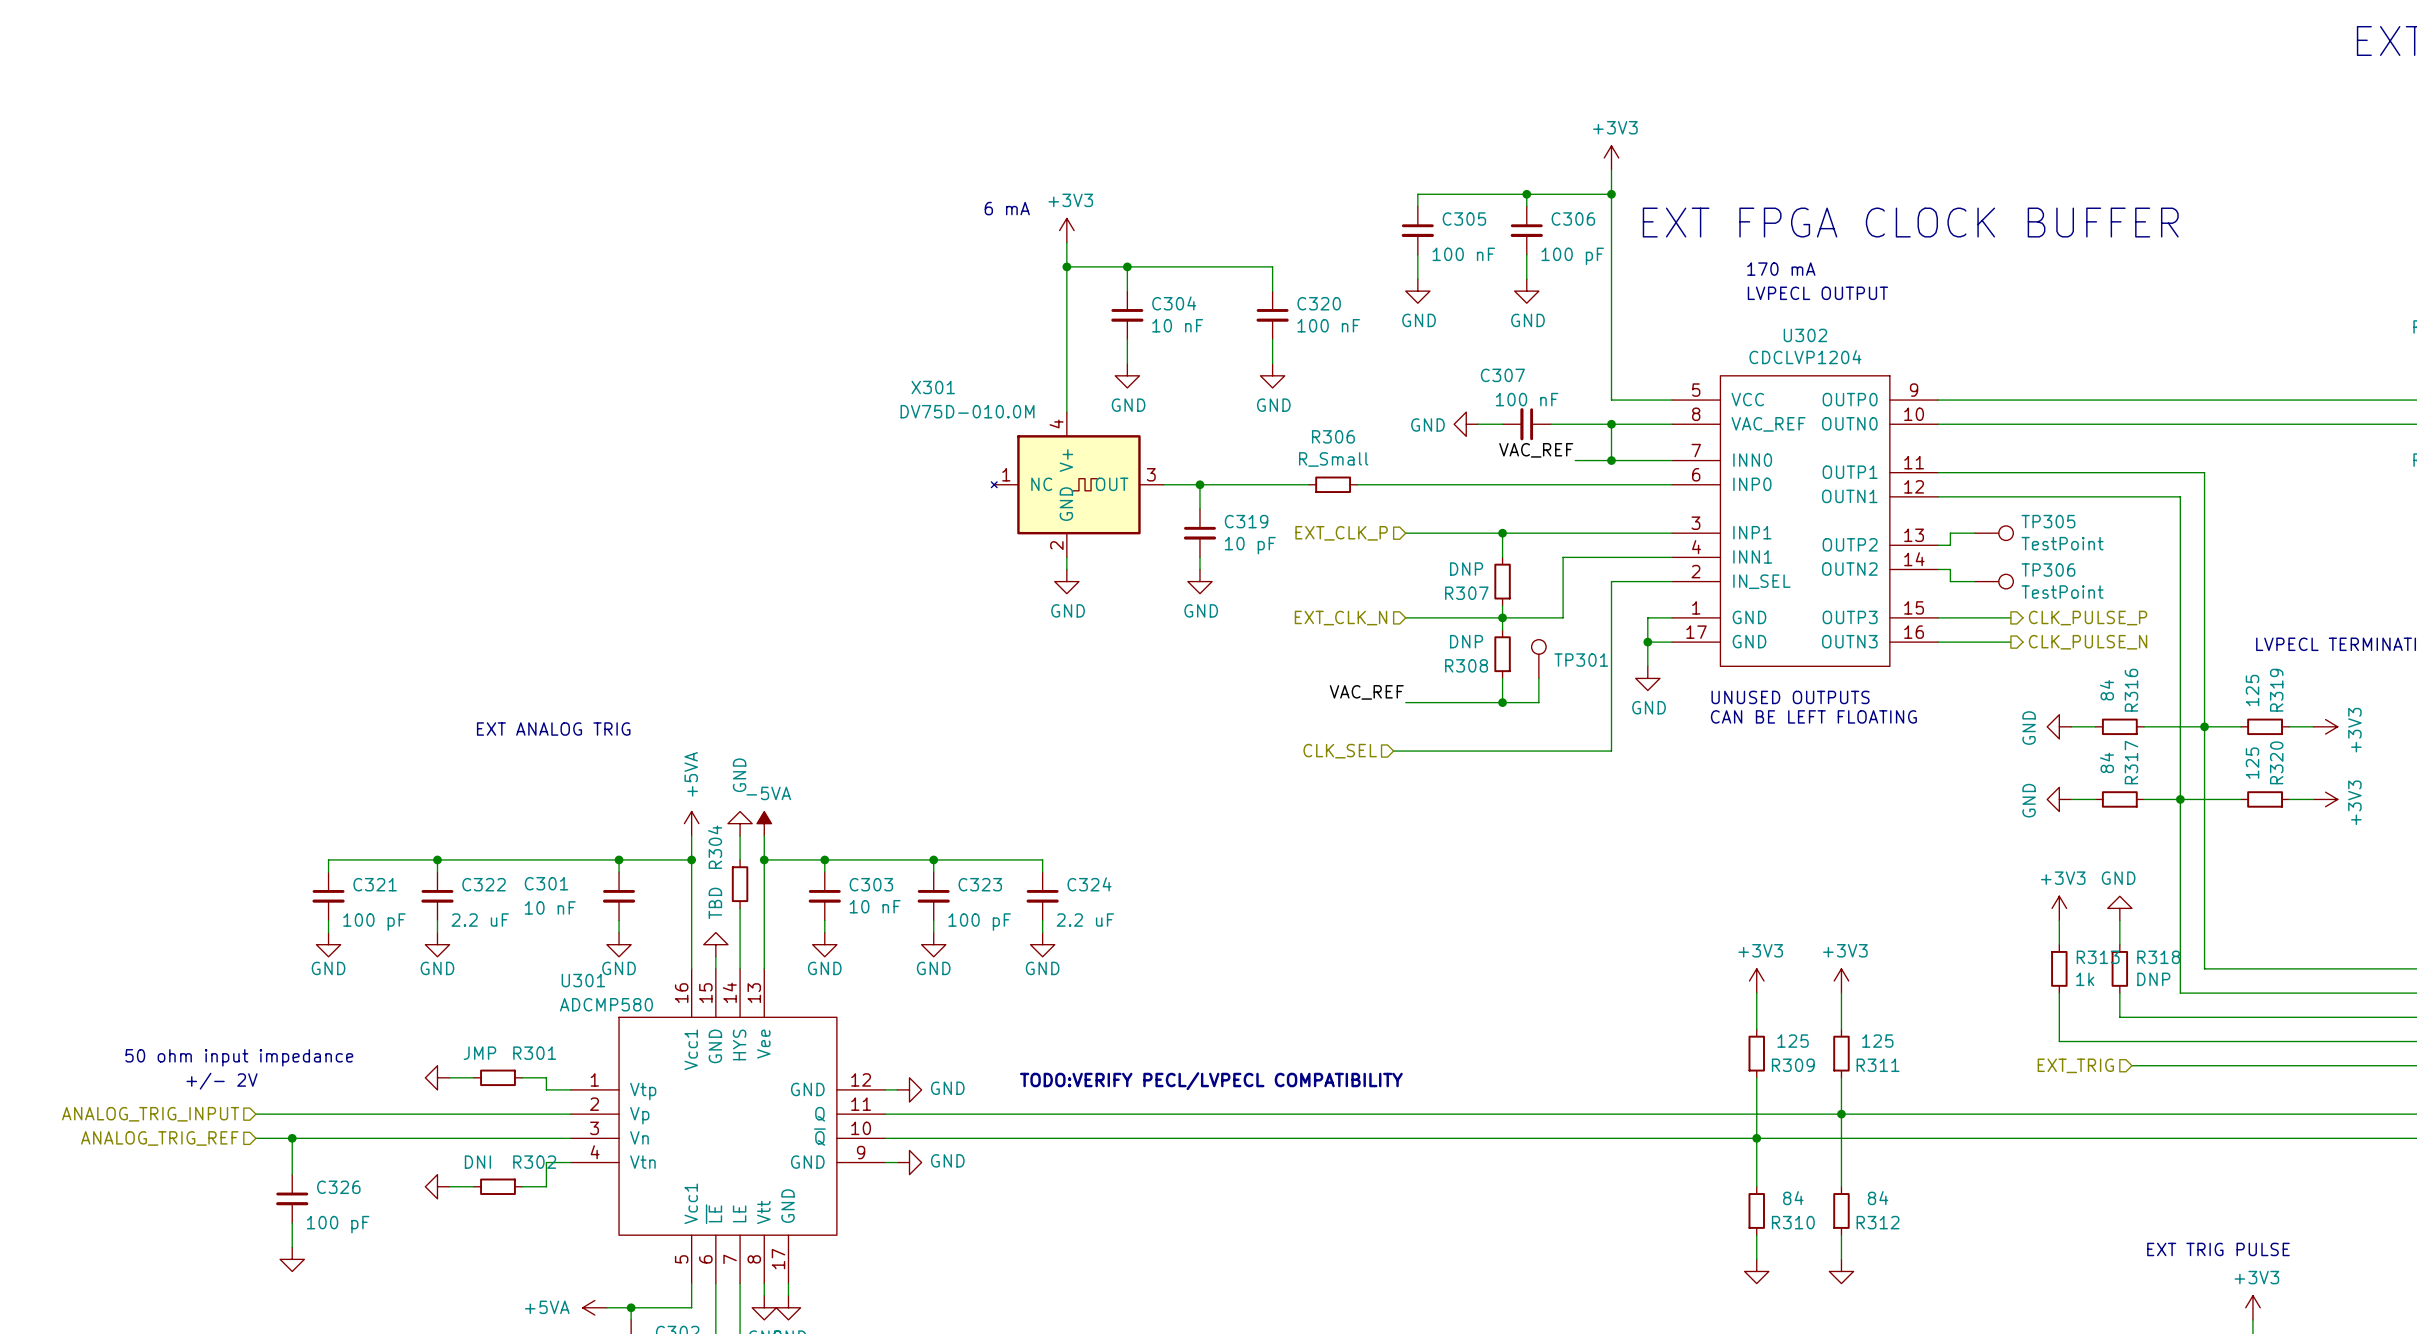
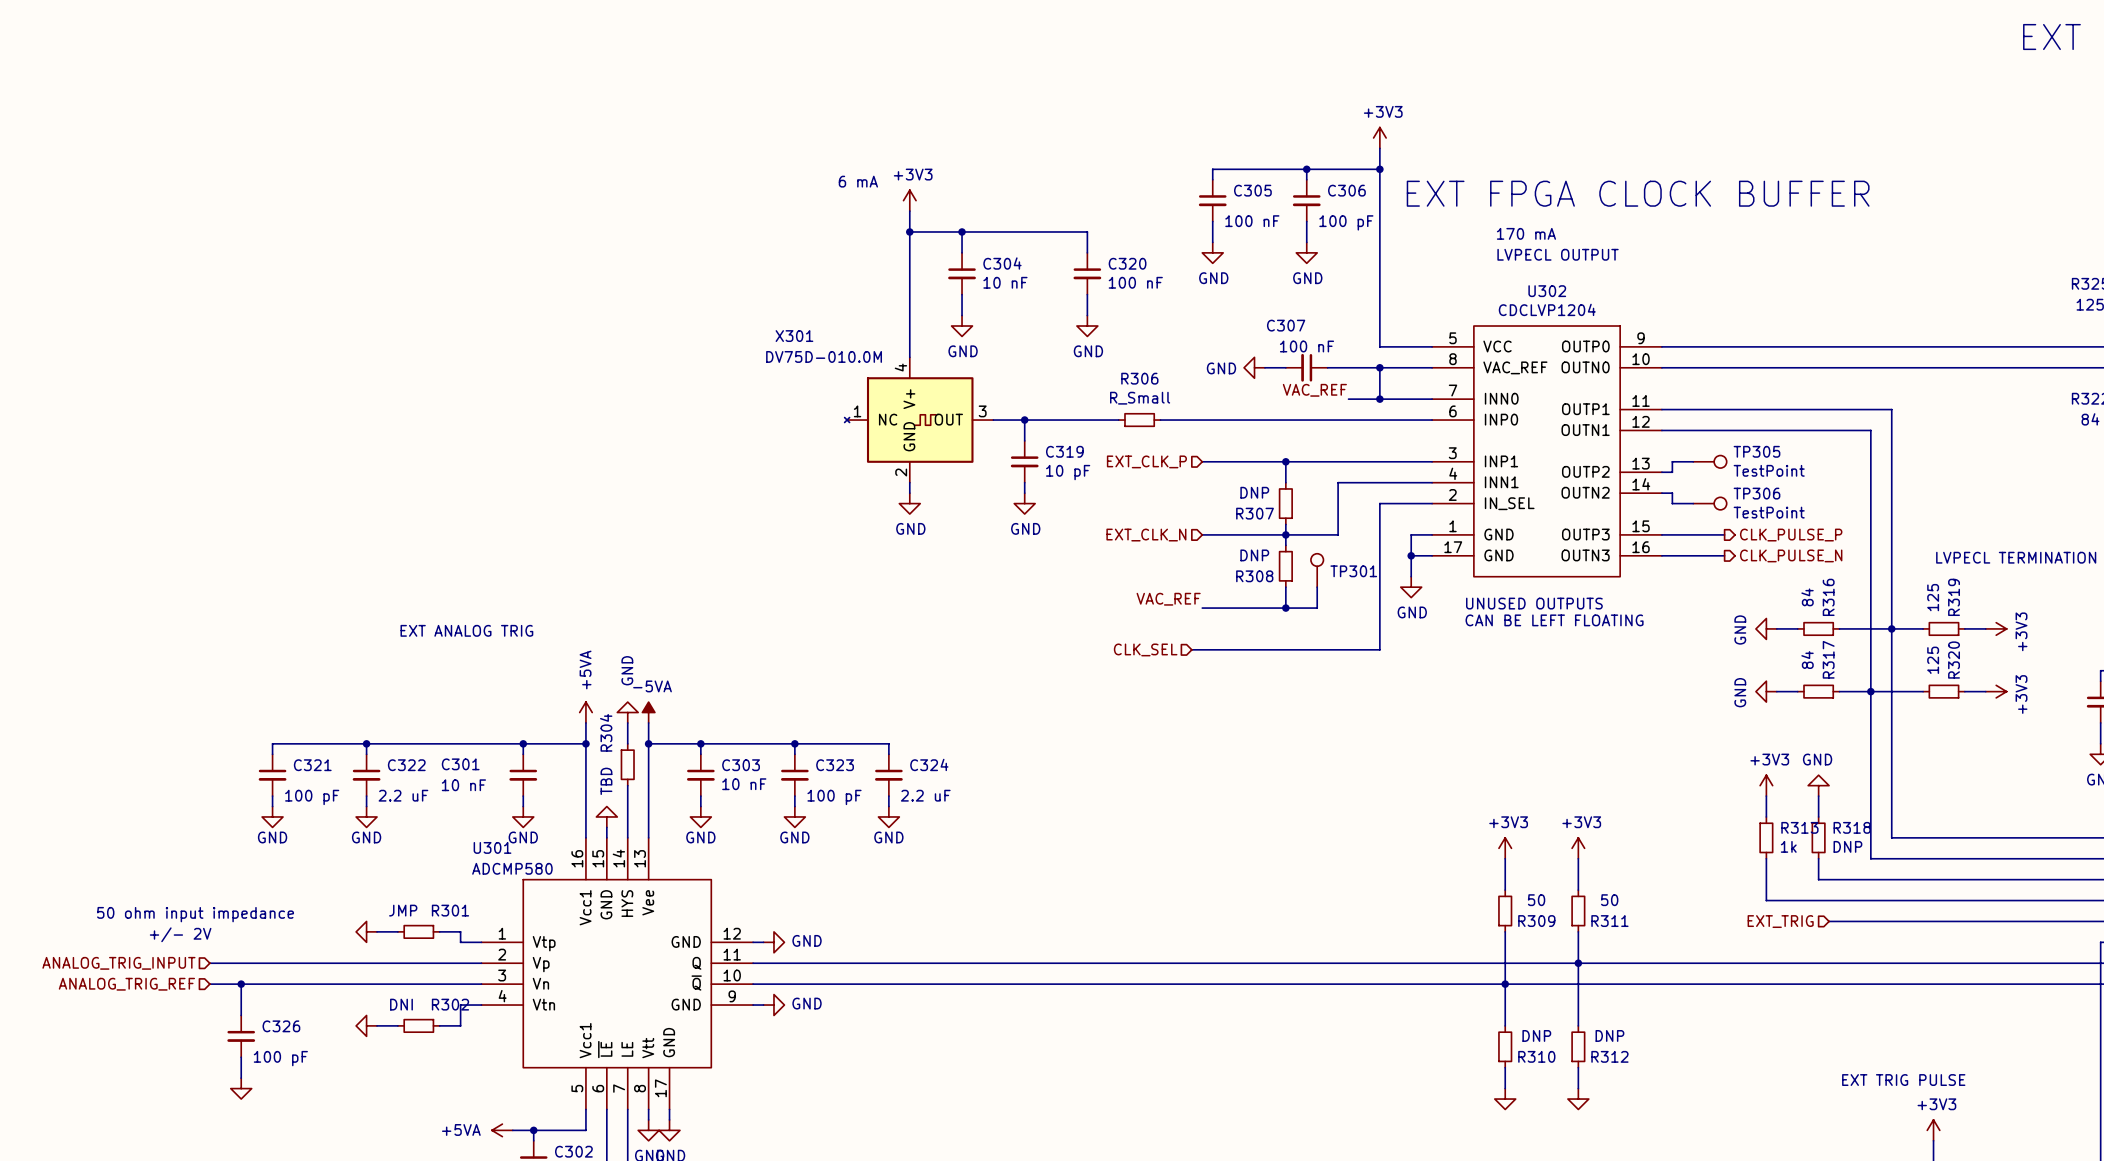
R309 value: 125 (1793, 1041) -> 50 (1536, 900)
R311 value: 125 (1877, 1041) -> 50 (1609, 900)
text: TODO:VERIFY PECL/LVPECL COMPATIBILITY (1211, 1081) -> none
R310 value: 84 (1793, 1198) -> DNP (1536, 1035)
R312 value: 84 (1878, 1198) -> DNP (1609, 1035)

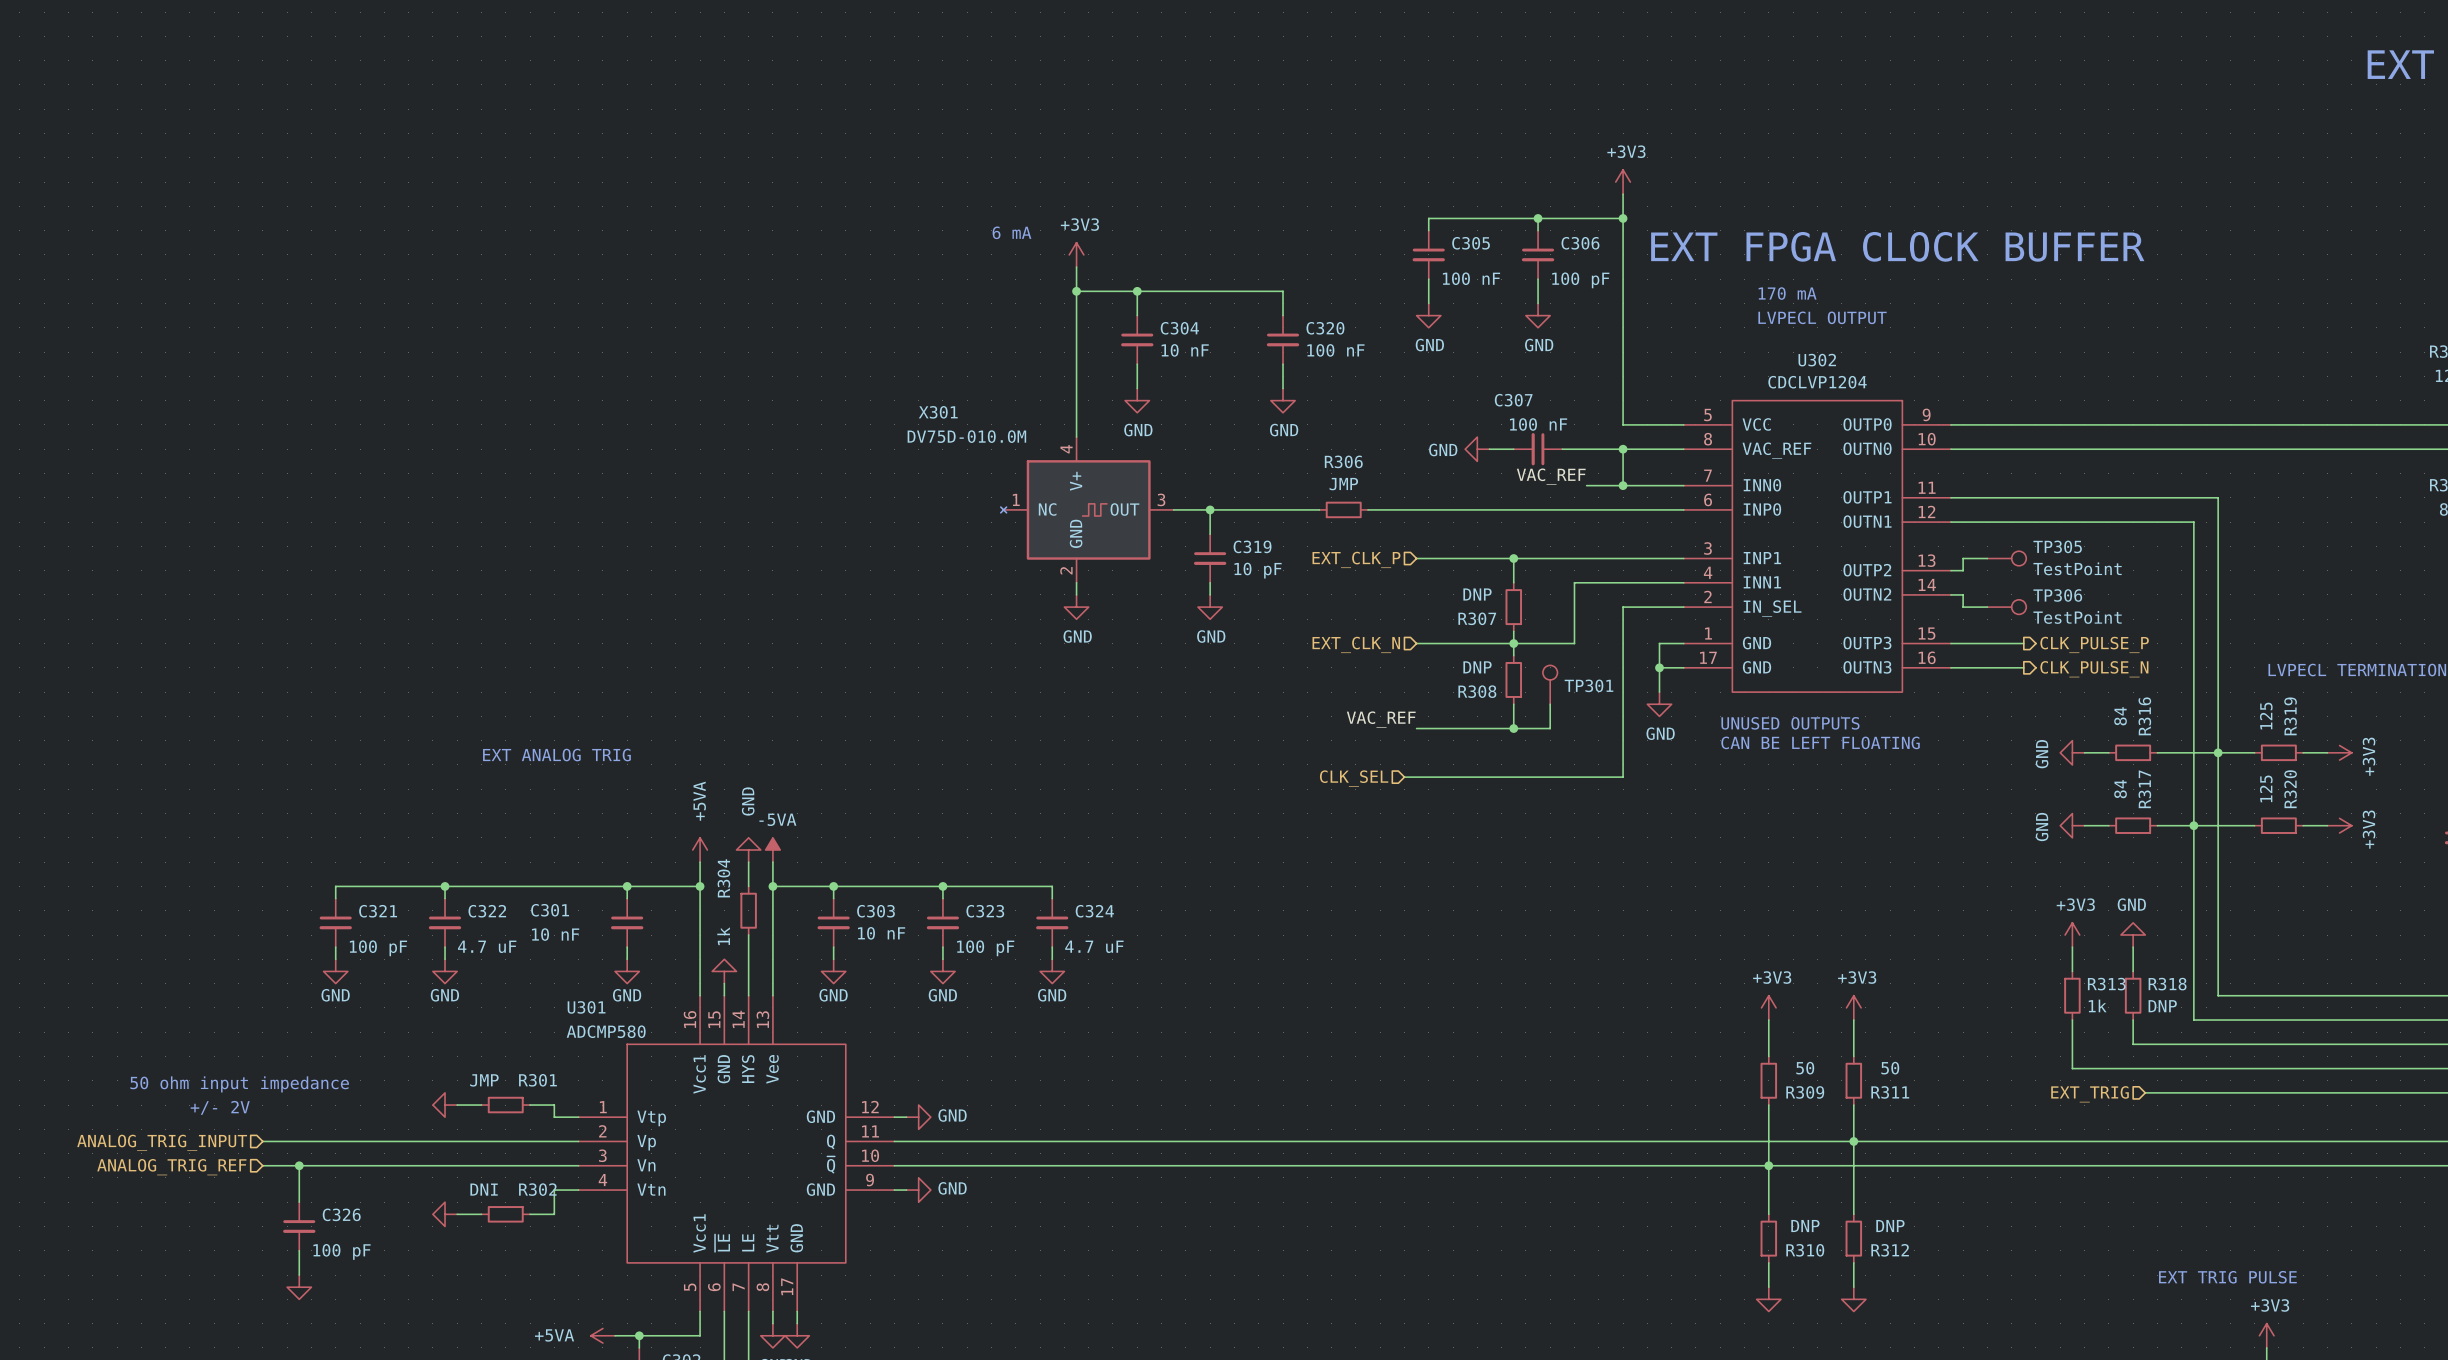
R306 value: R_Small (1140, 398) -> JMP (1343, 484)
R304 value: TBD (606, 781) -> 1k (723, 936)
C322 value: 2.2 uF (403, 795) -> 4.7 uF (487, 946)
C324 value: 2.2 uF (925, 795) -> 4.7 uF (1094, 946)

